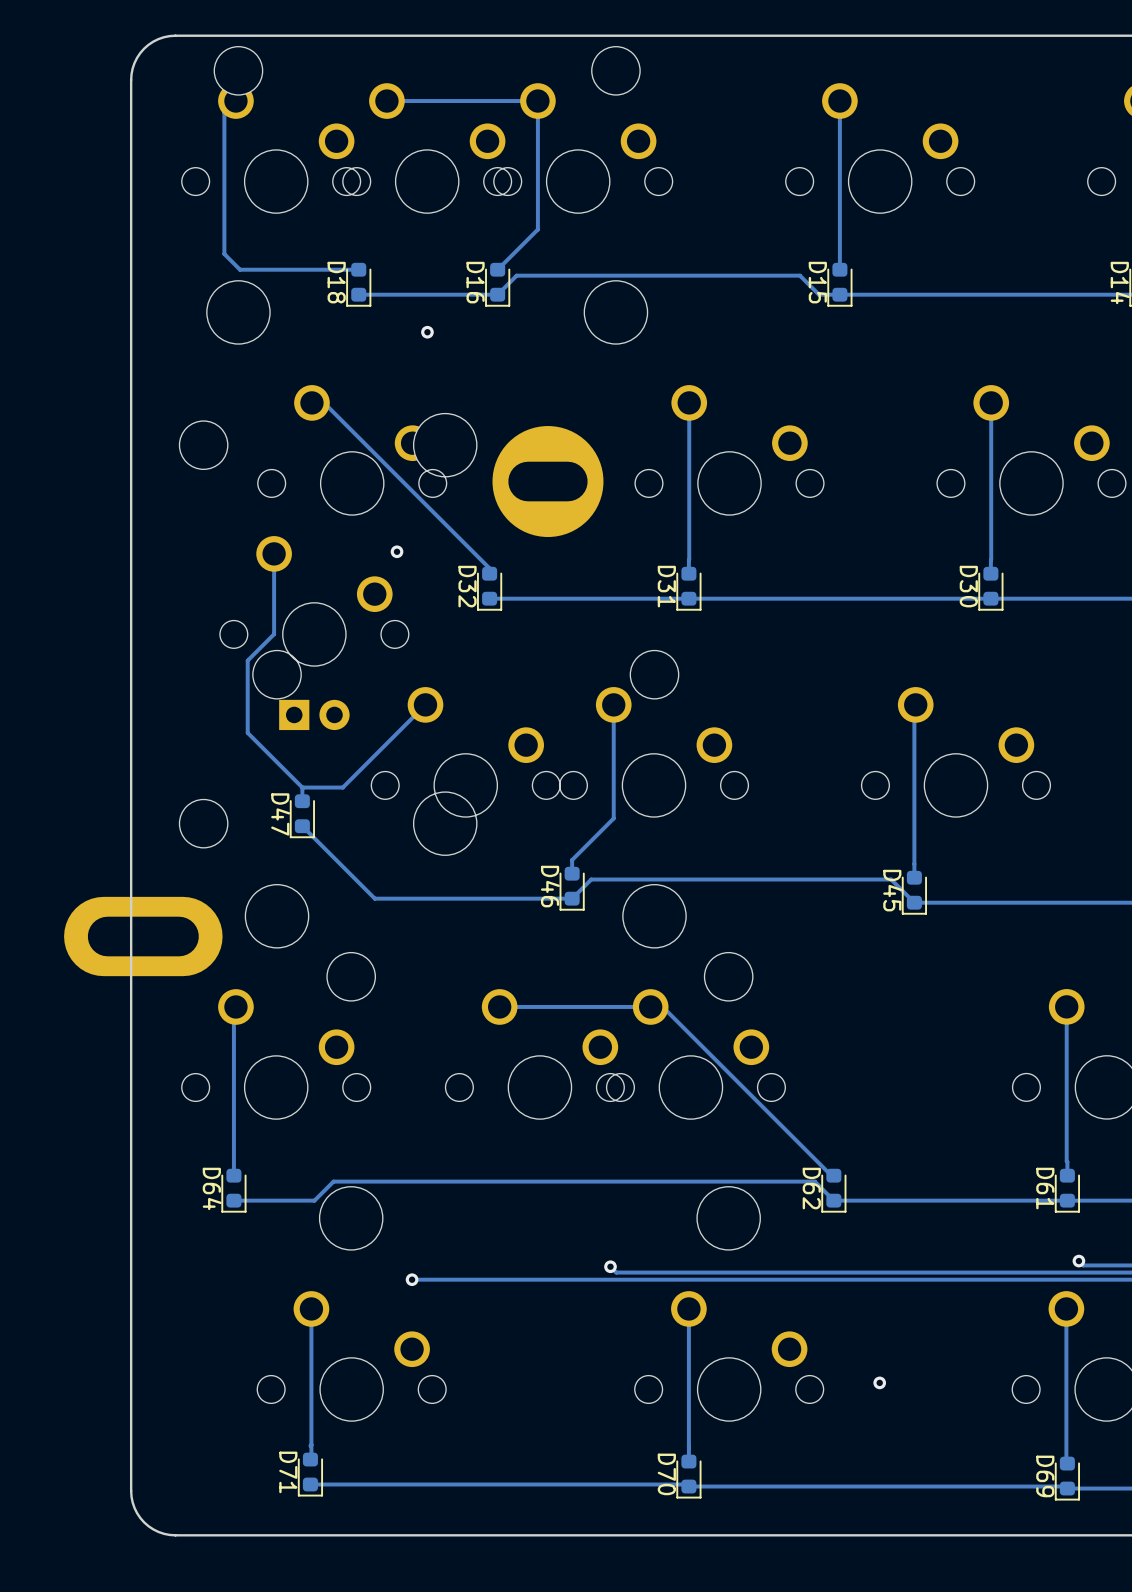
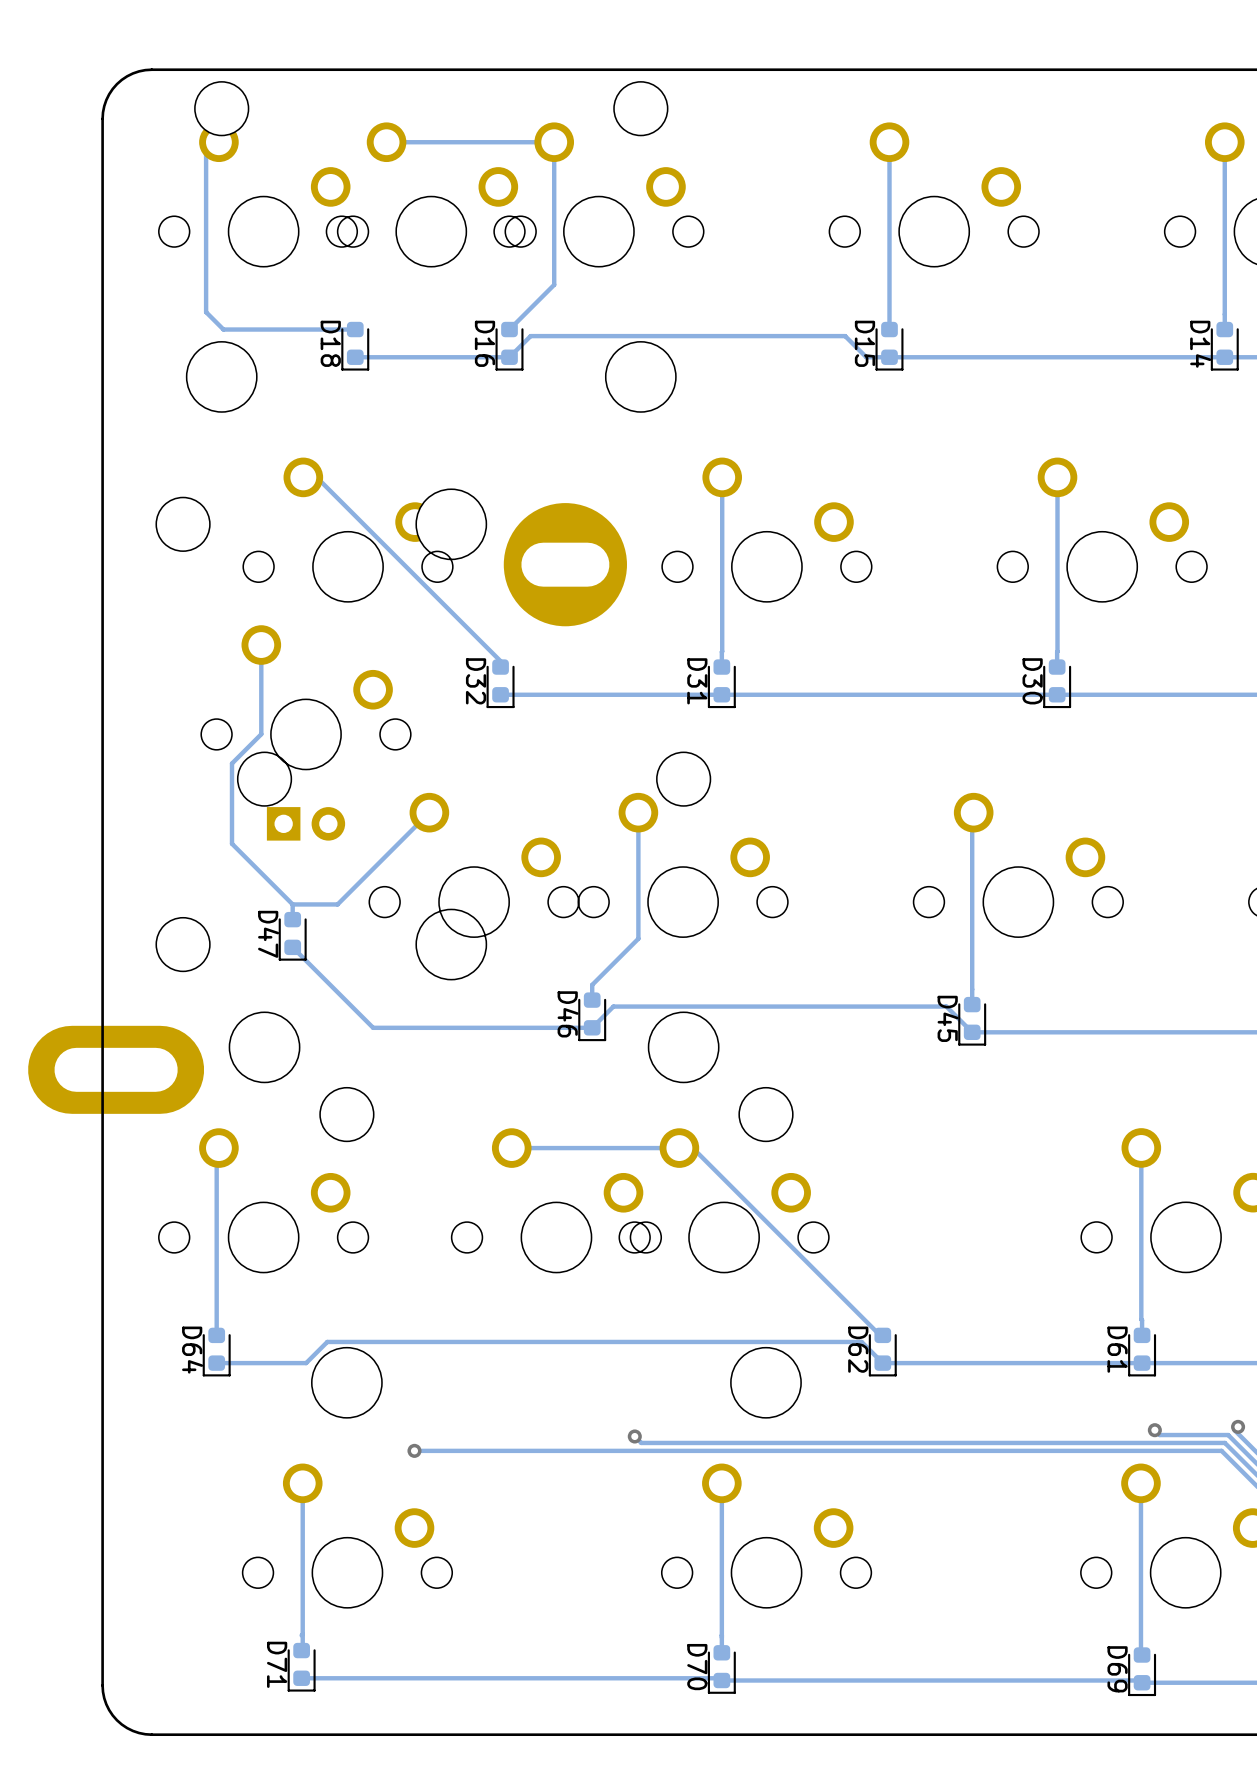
via: (427, 332) -> none
via: (397, 551) -> none
via: (879, 1382) -> none

